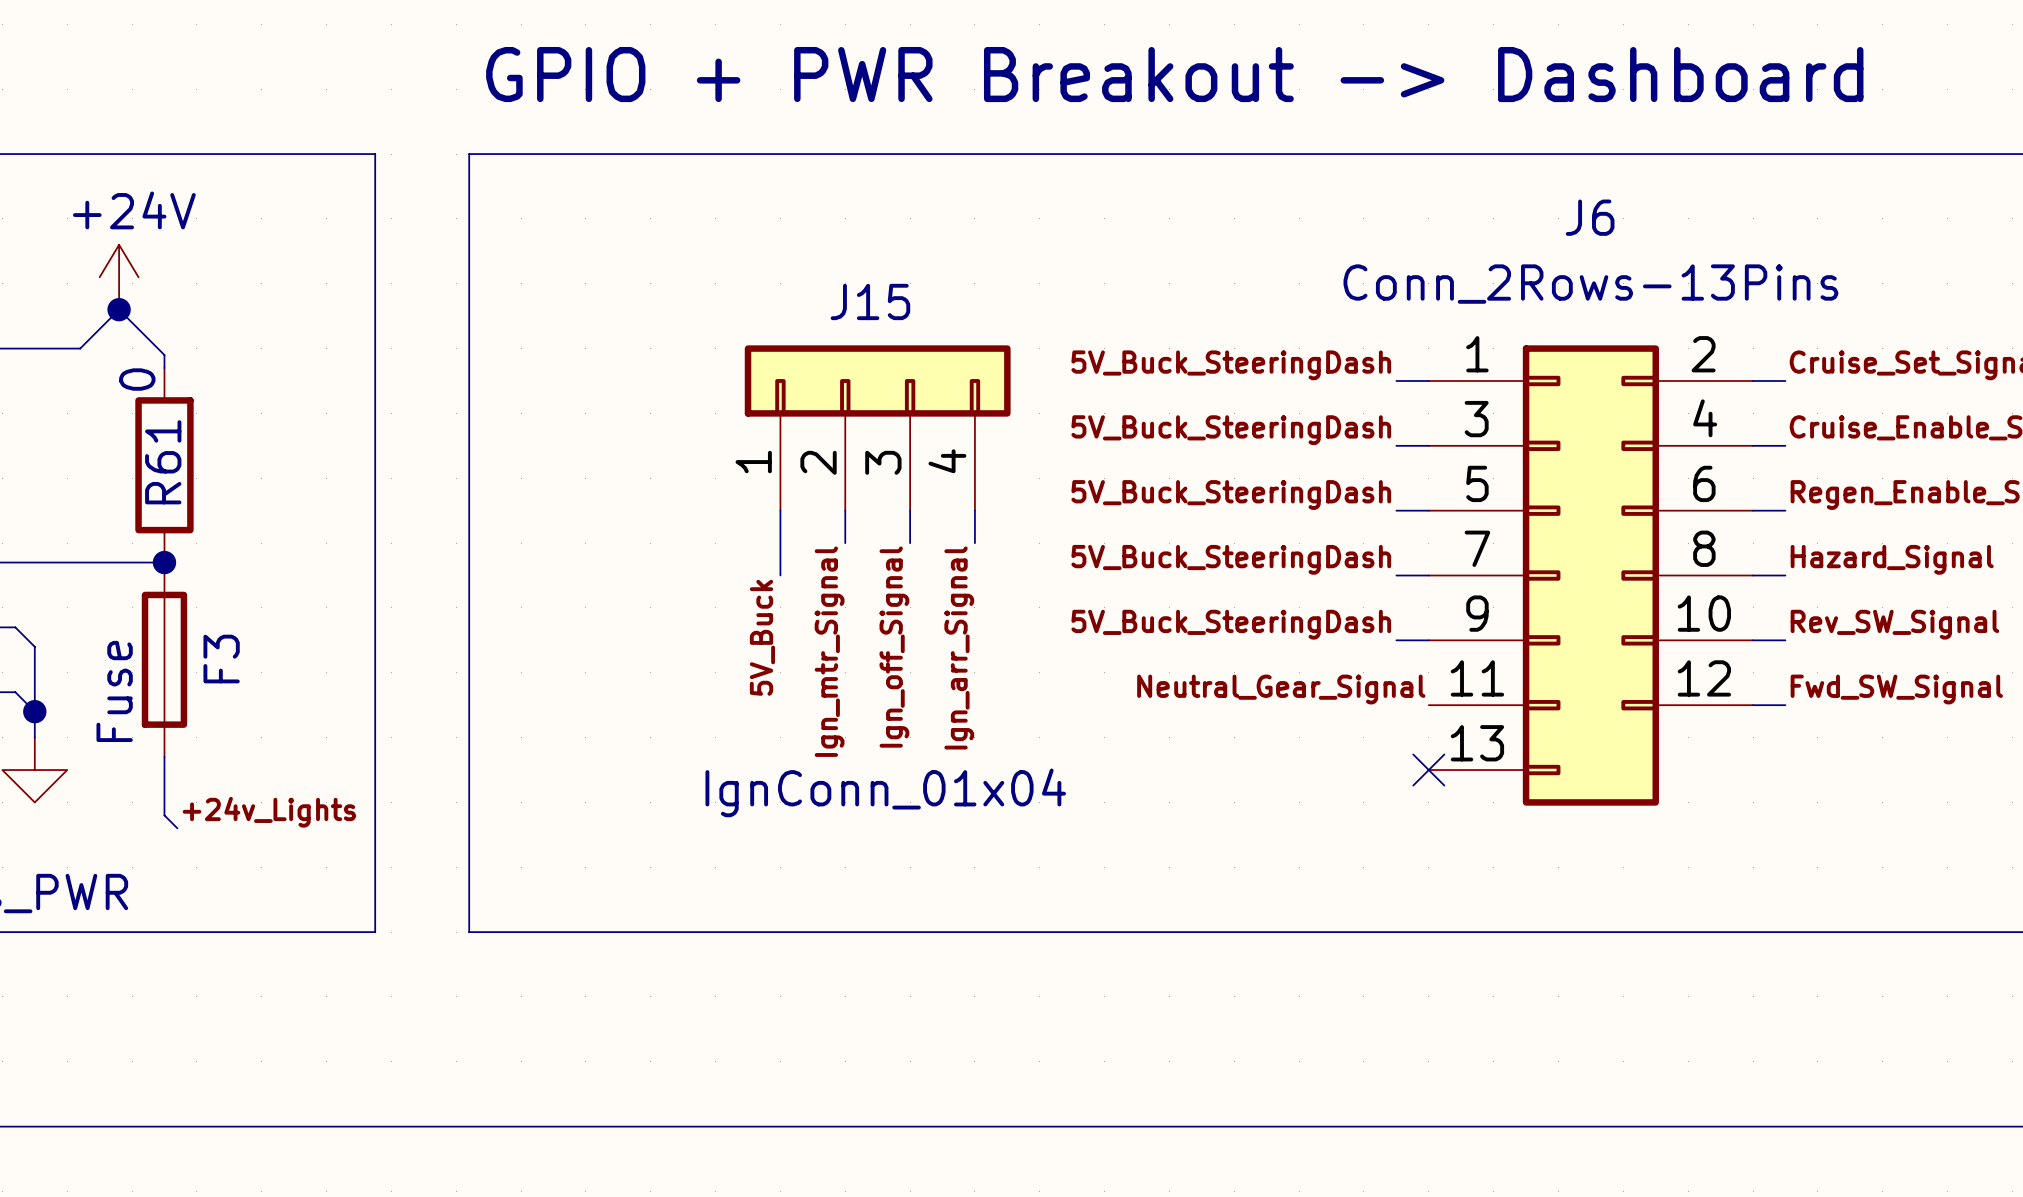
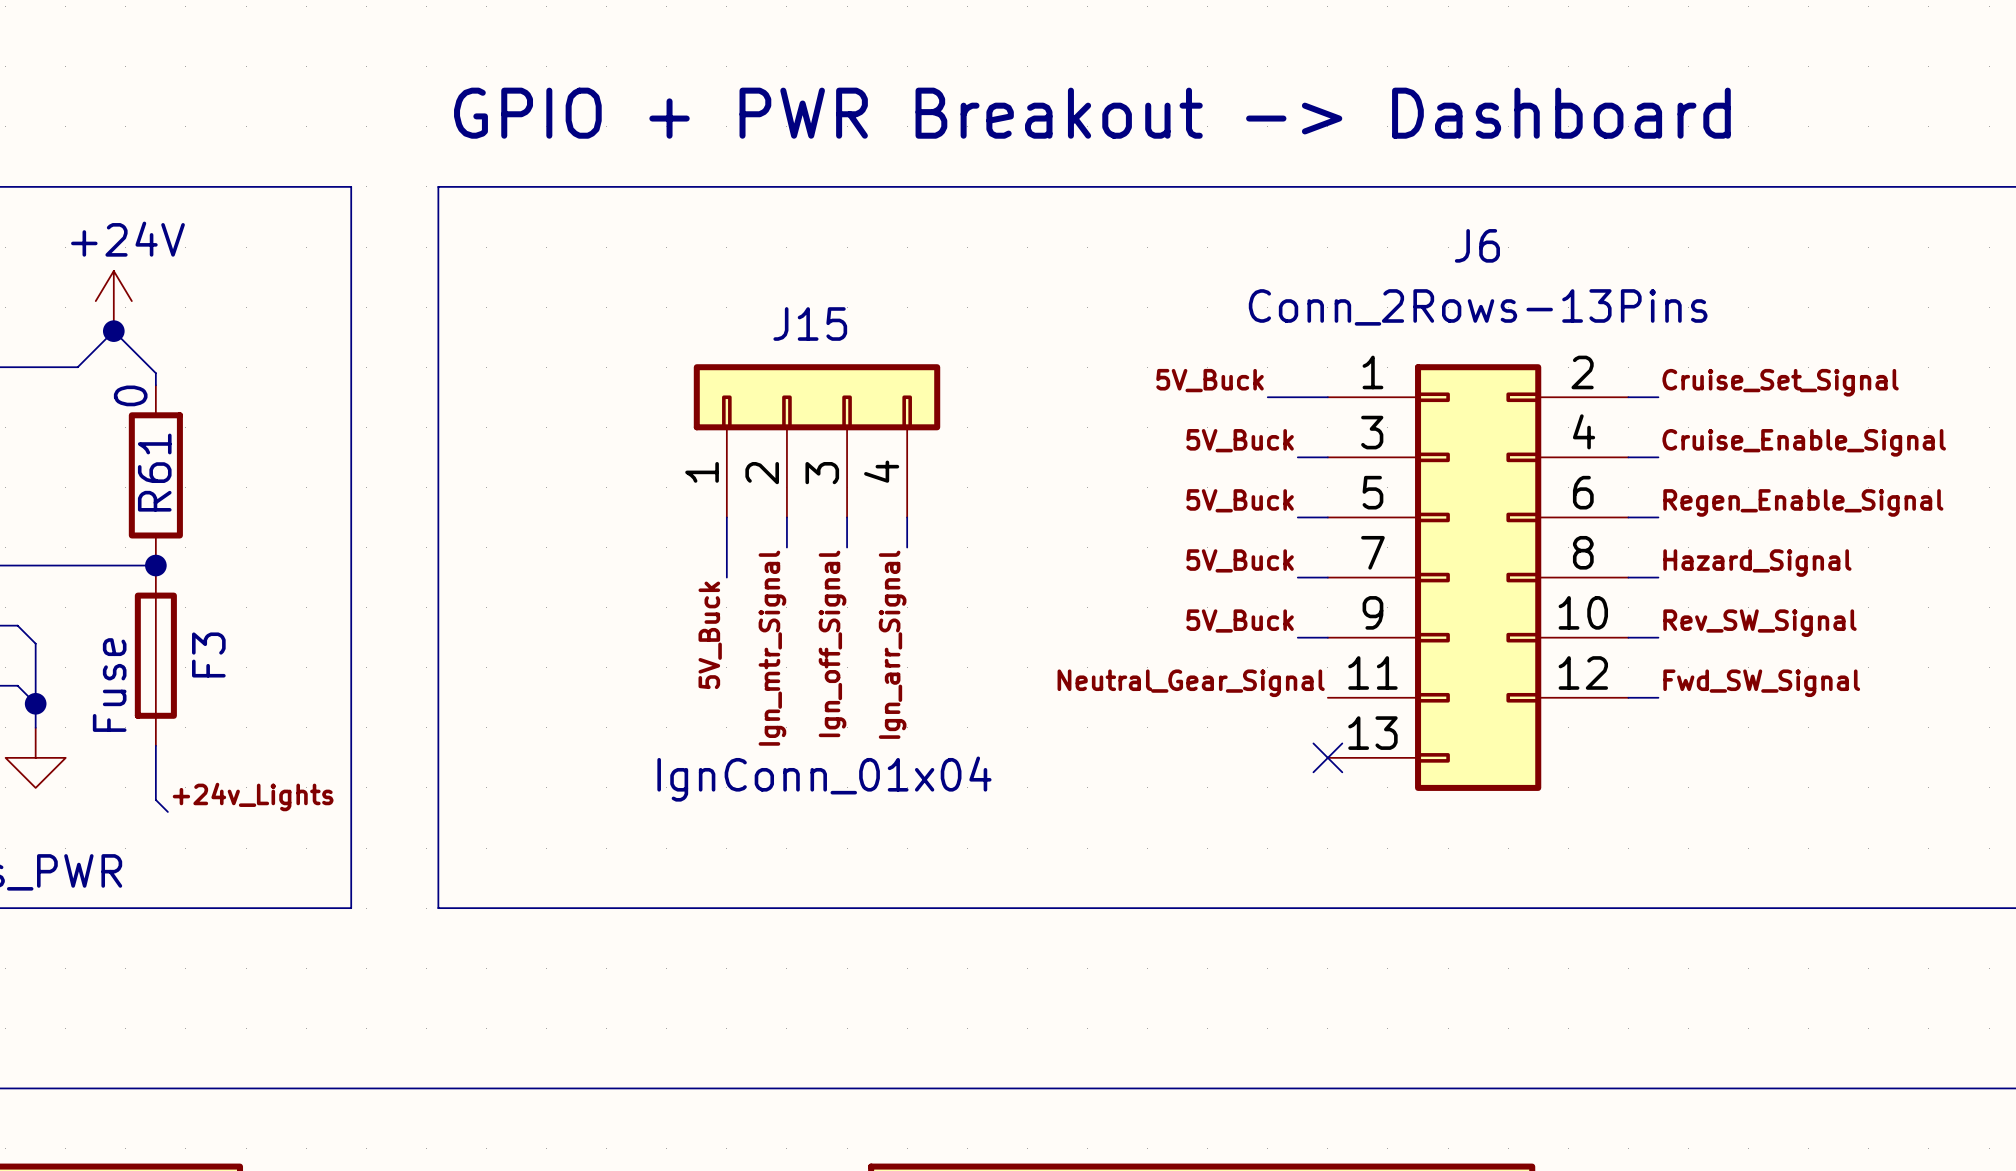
label: none -> 5V_Buck (1210, 380)
label: 5V_Buck_SteeringDash (1231, 365) -> none
wire: none -> (1267, 397) (1297, 397)
label: 5V_Buck_SteeringDash (1231, 430) -> 5V_Buck (1240, 440)
label: 5V_Buck_SteeringDash (1231, 494) -> 5V_Buck (1240, 500)
label: 5V_Buck_SteeringDash (1231, 559) -> 5V_Buck (1240, 560)
label: 5V_Buck_SteeringDash (1231, 624) -> 5V_Buck (1240, 620)

